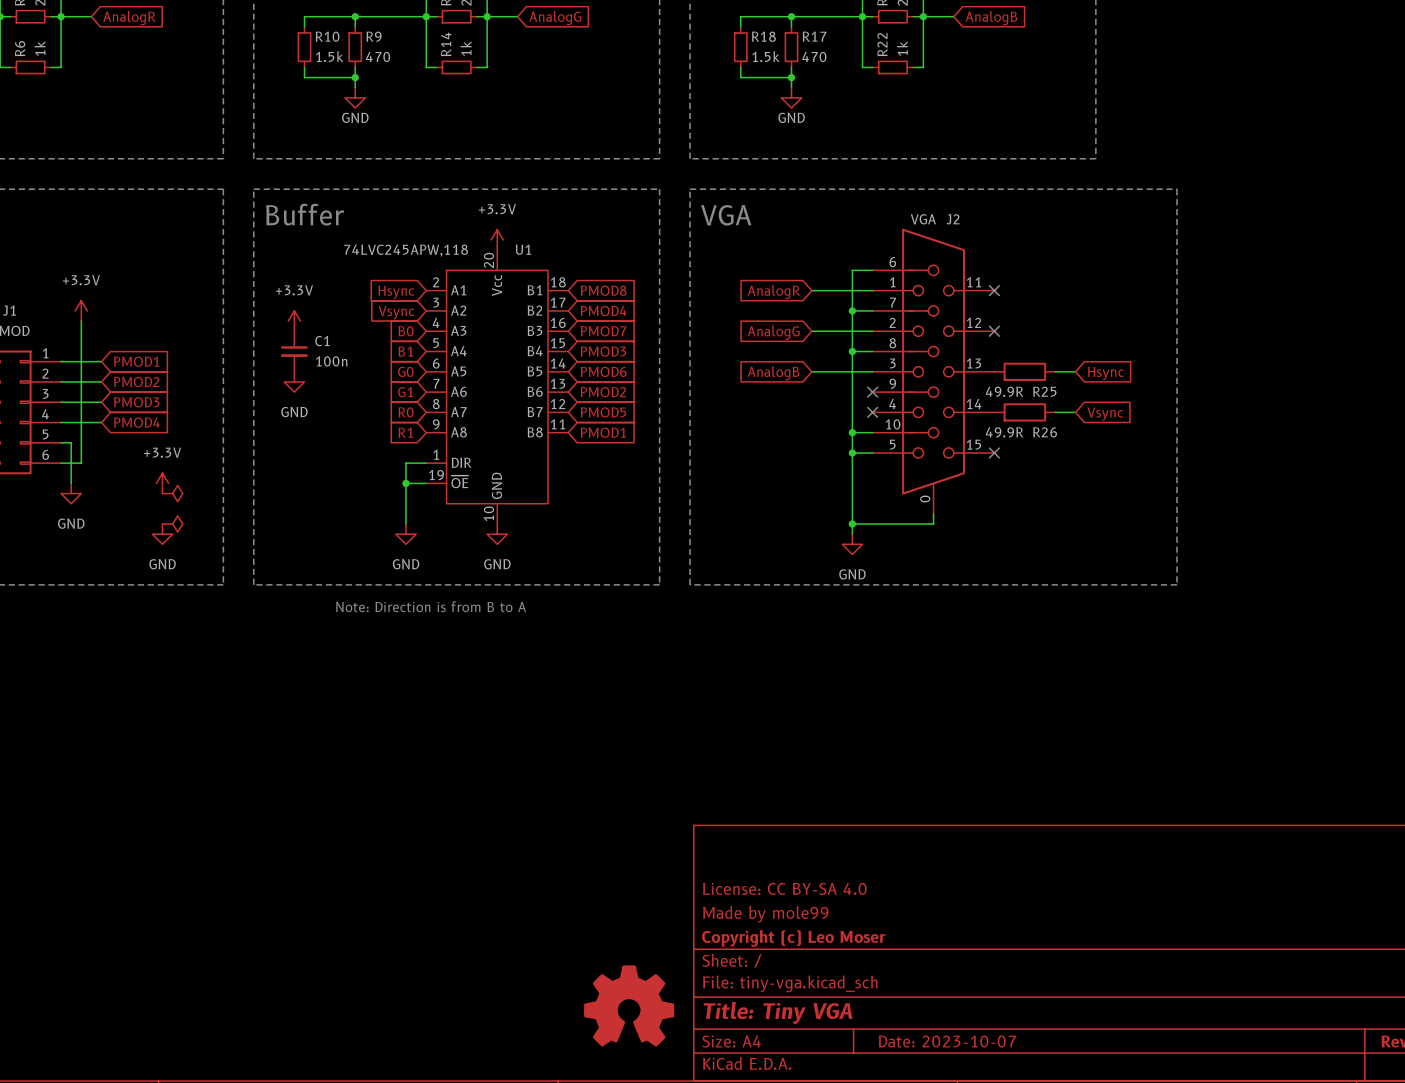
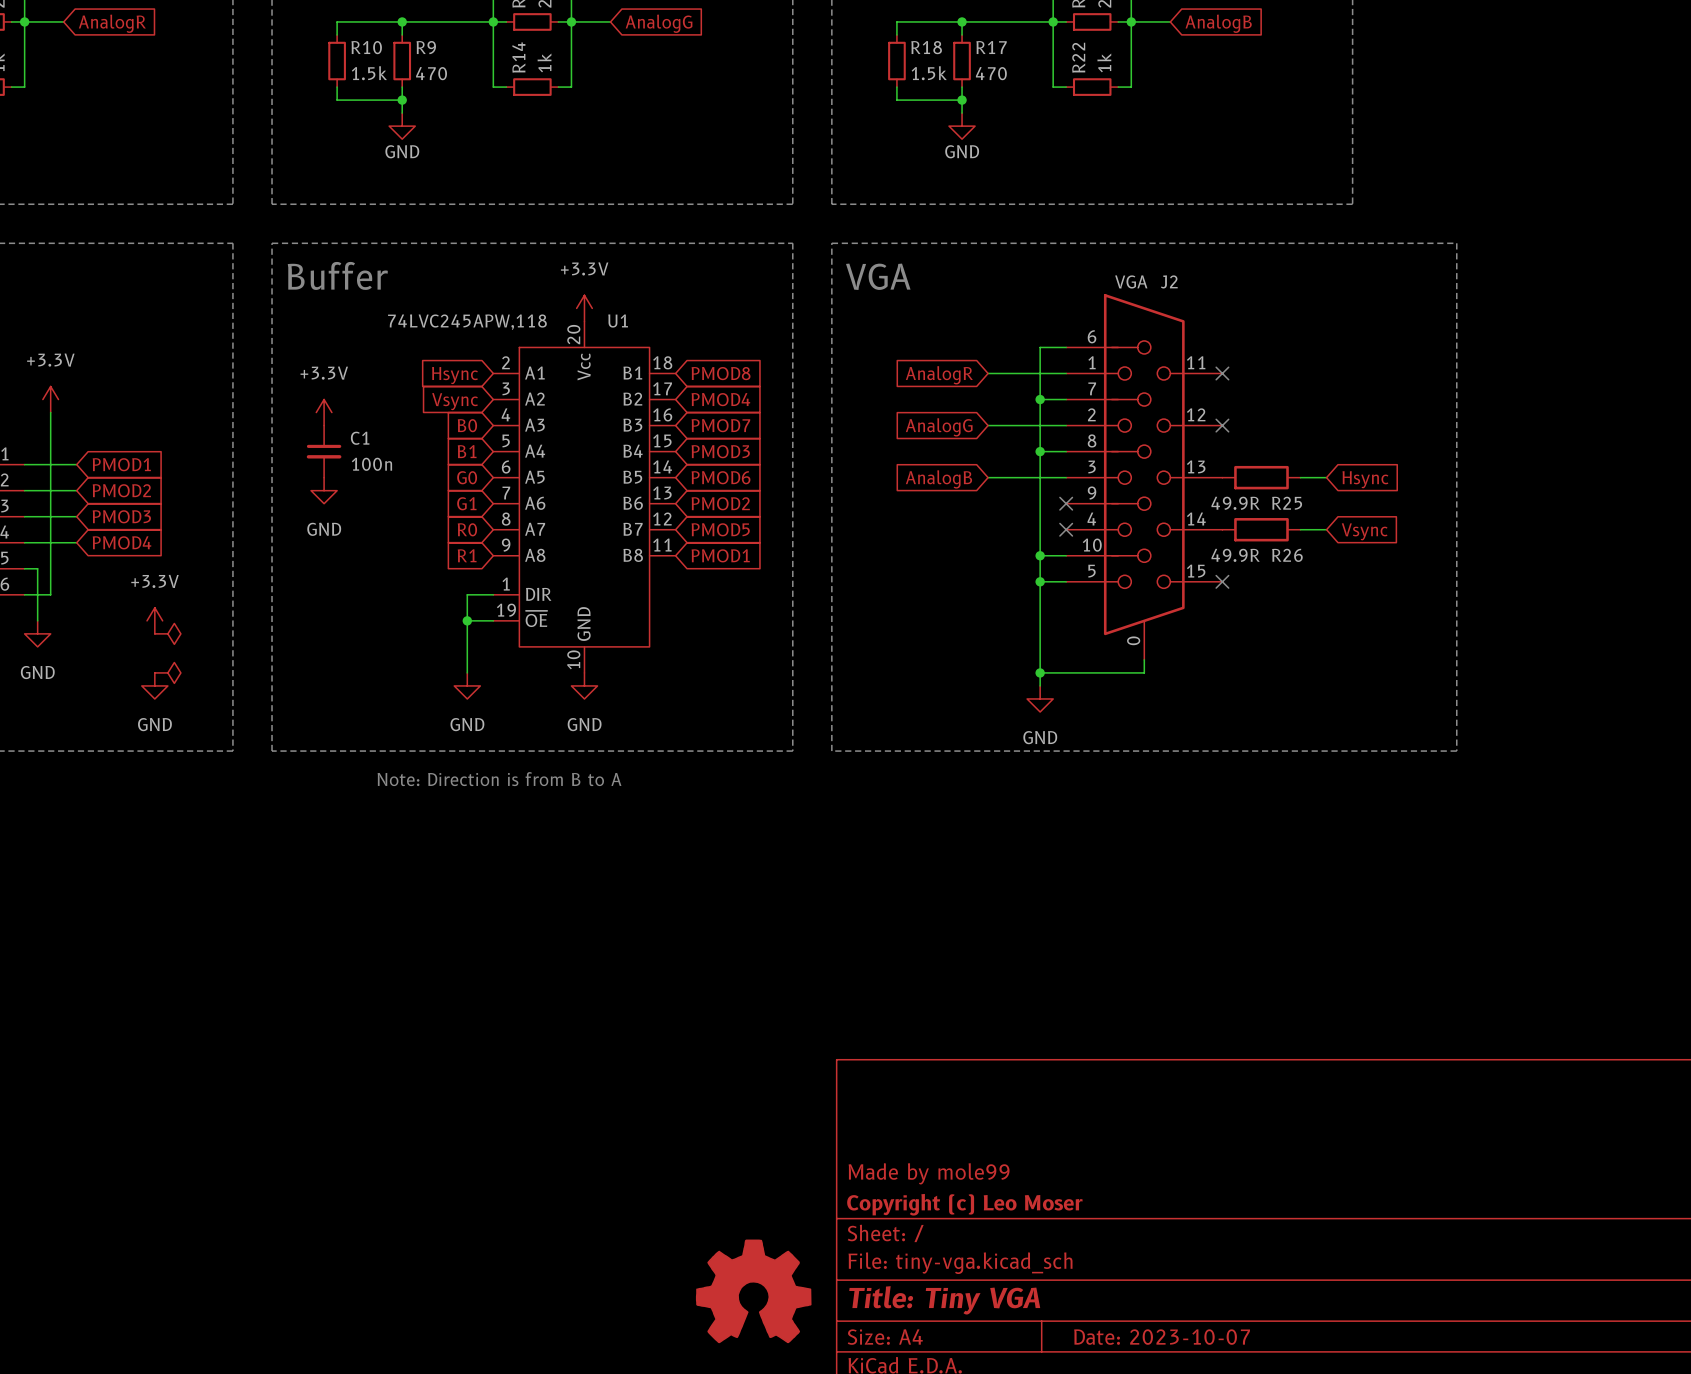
title block: License: CC BY-SA 4.0 (784, 888) -> none

